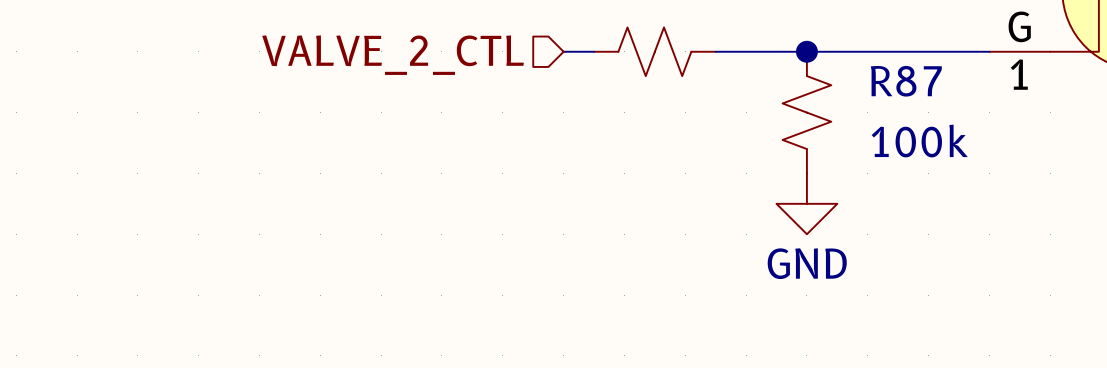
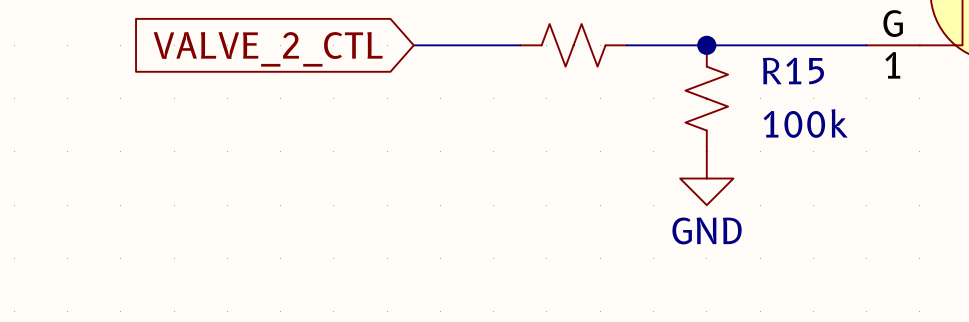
wire: none -> (413, 45) (493, 45)
hierarchical label: VALVE_2_CTL (393, 55) -> none
global label: none -> VALVE_2_CTL (268, 49)
R87 name: R87 (906, 81) -> R15 (793, 70)

